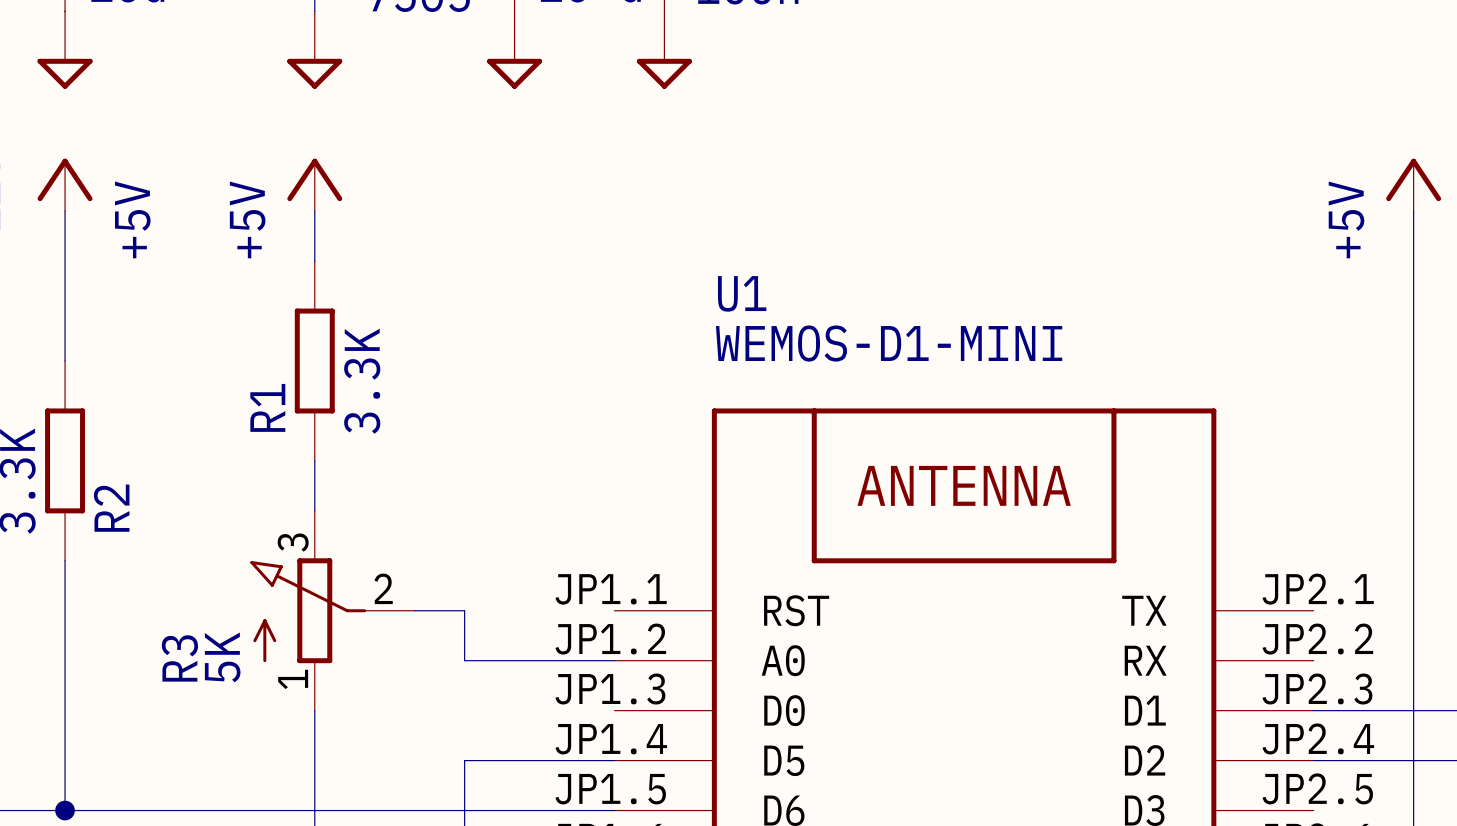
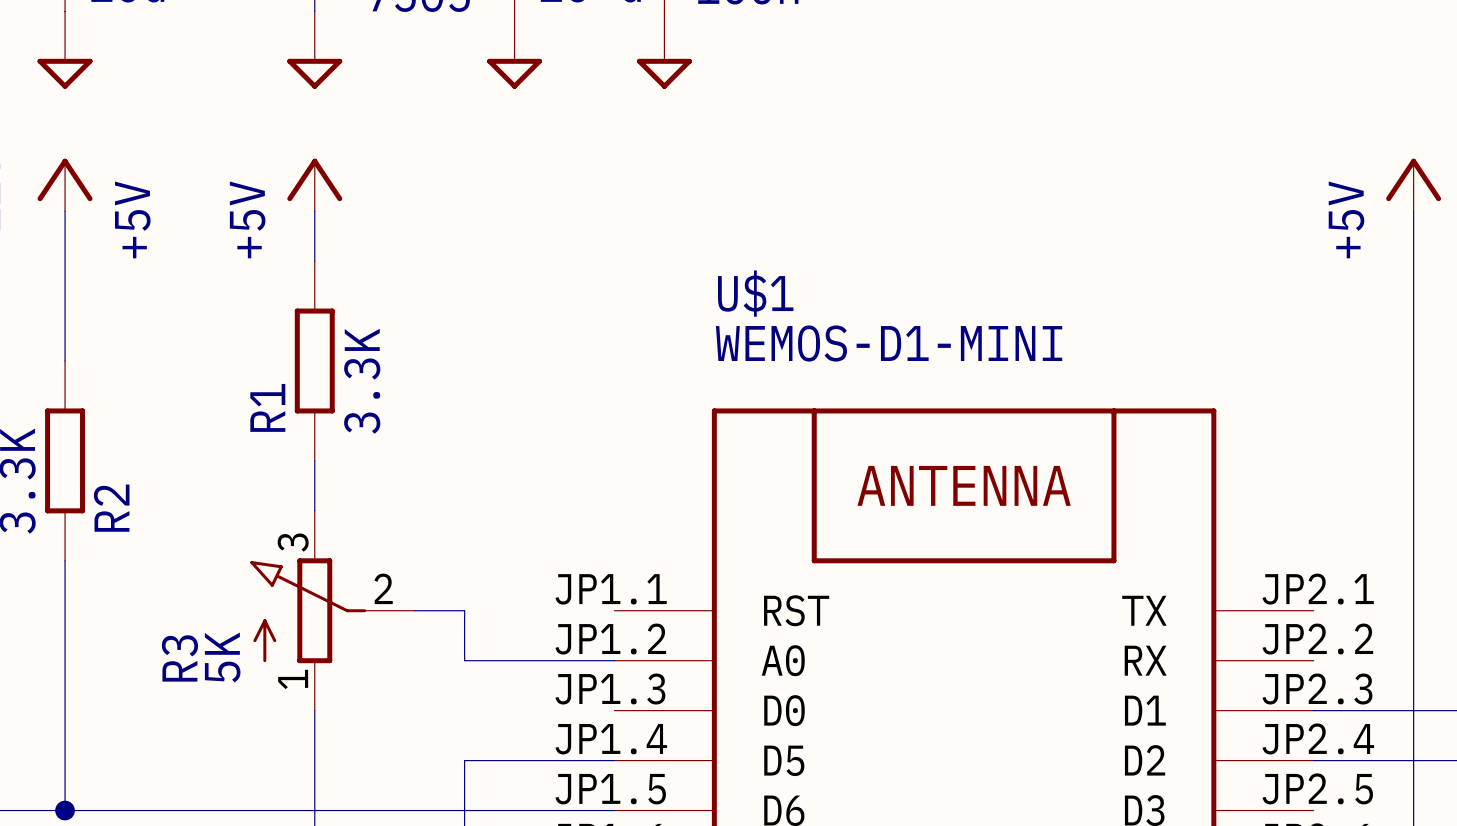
U1 name: U1 (742, 293) -> U$1 (755, 293)

